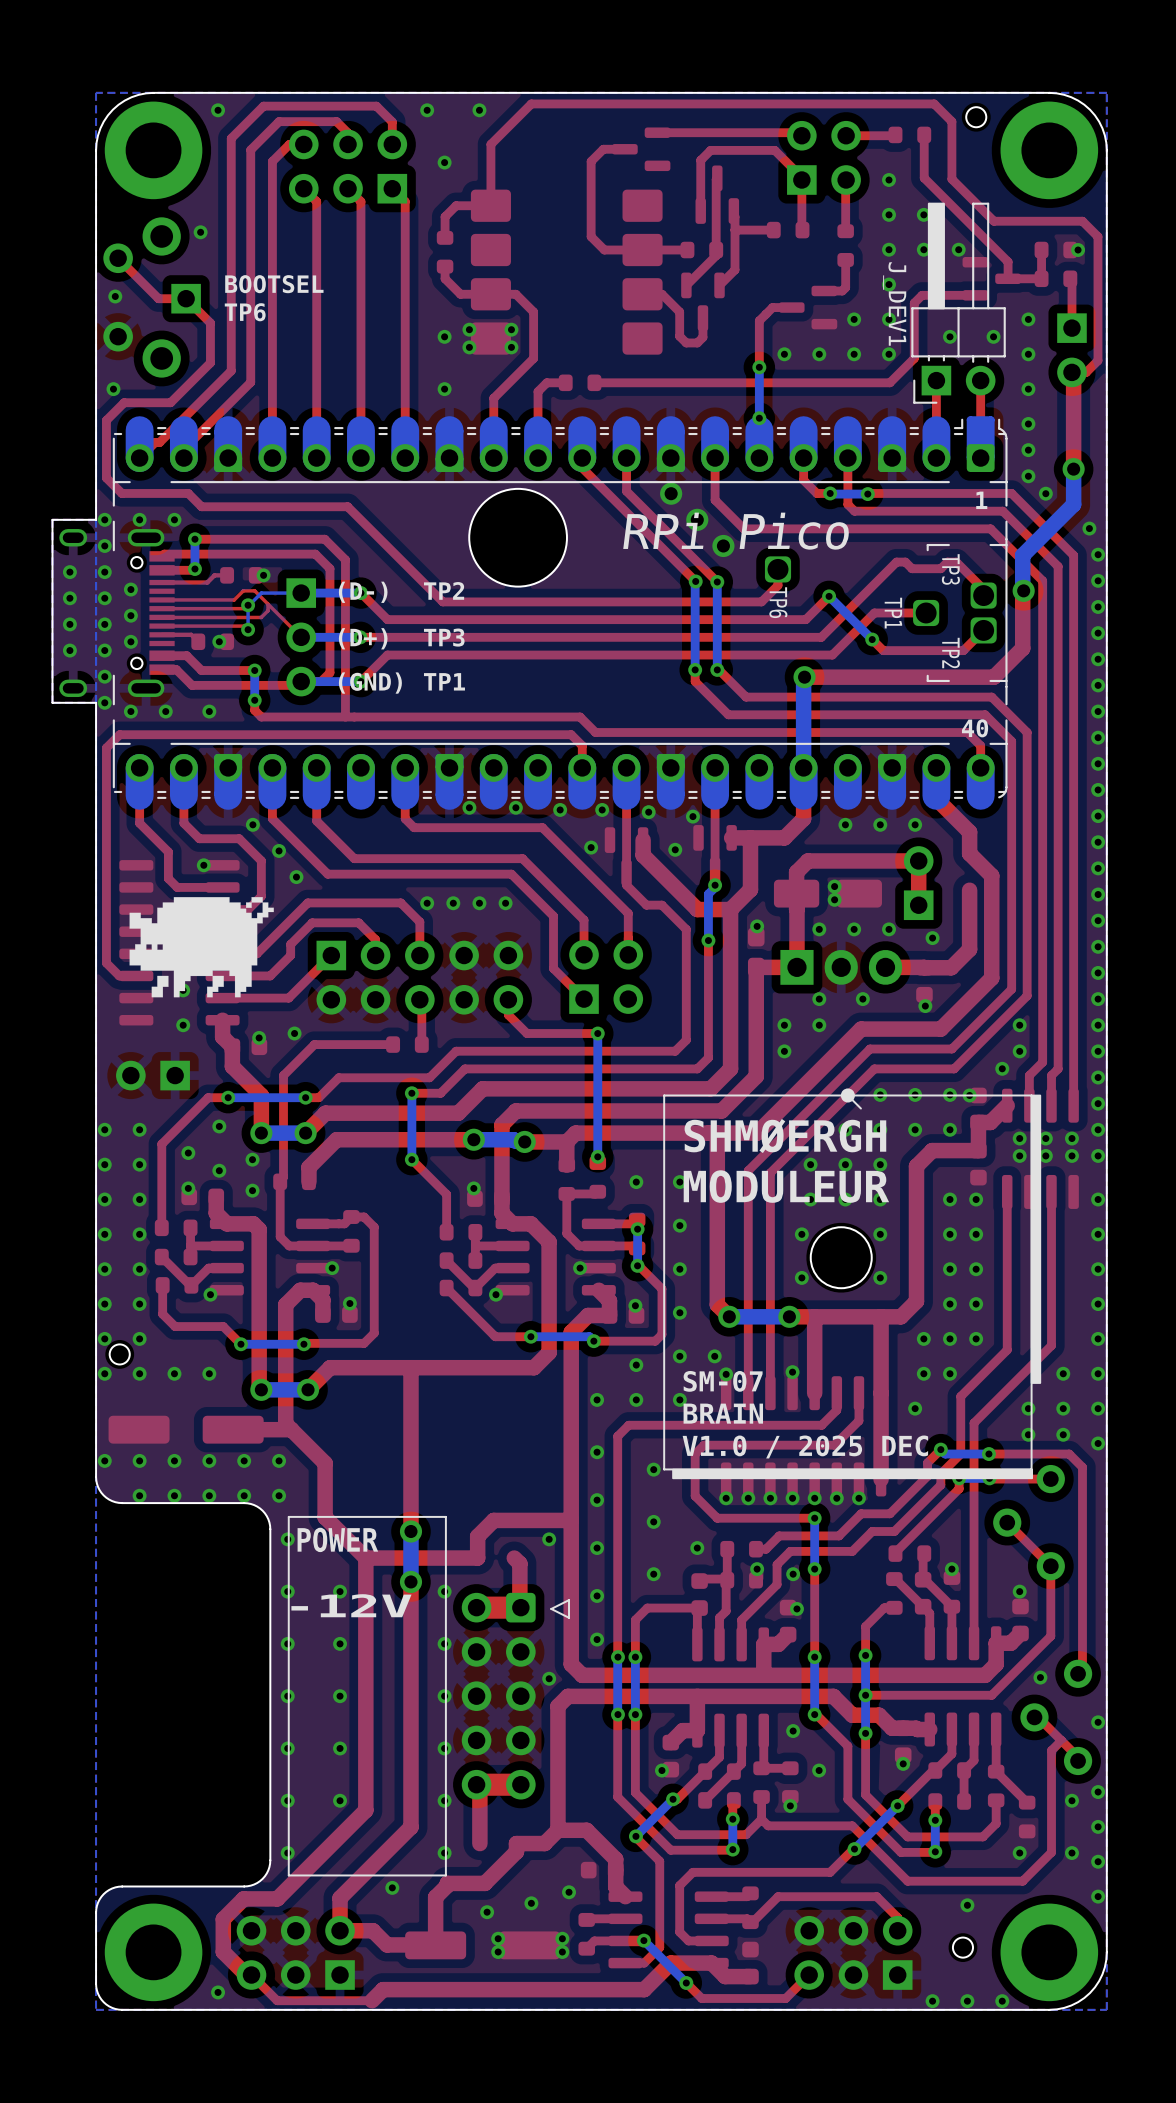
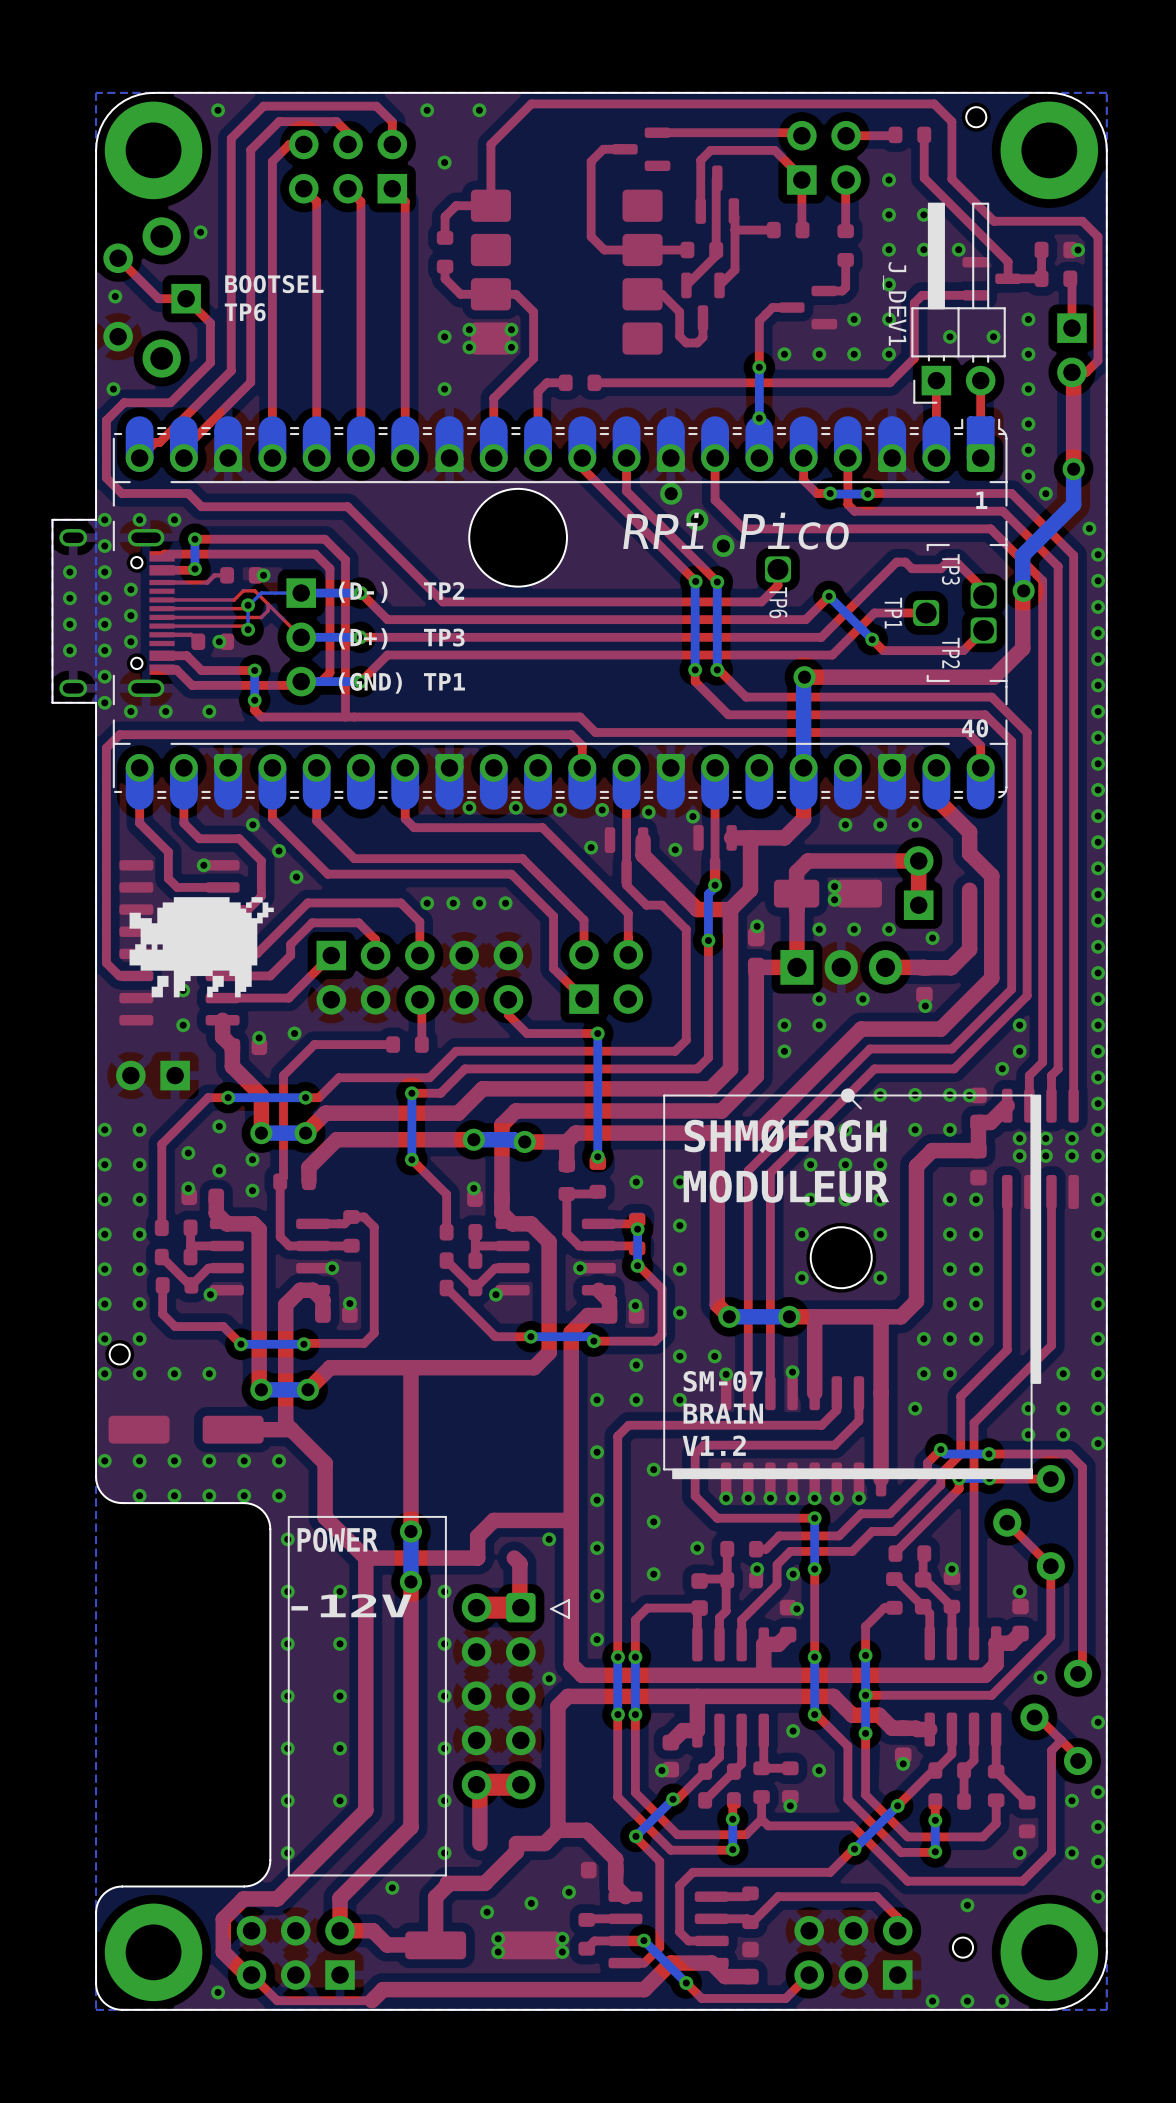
text: V1.0 / 2025 DEC (805, 1446) -> V1.2 (714, 1445)

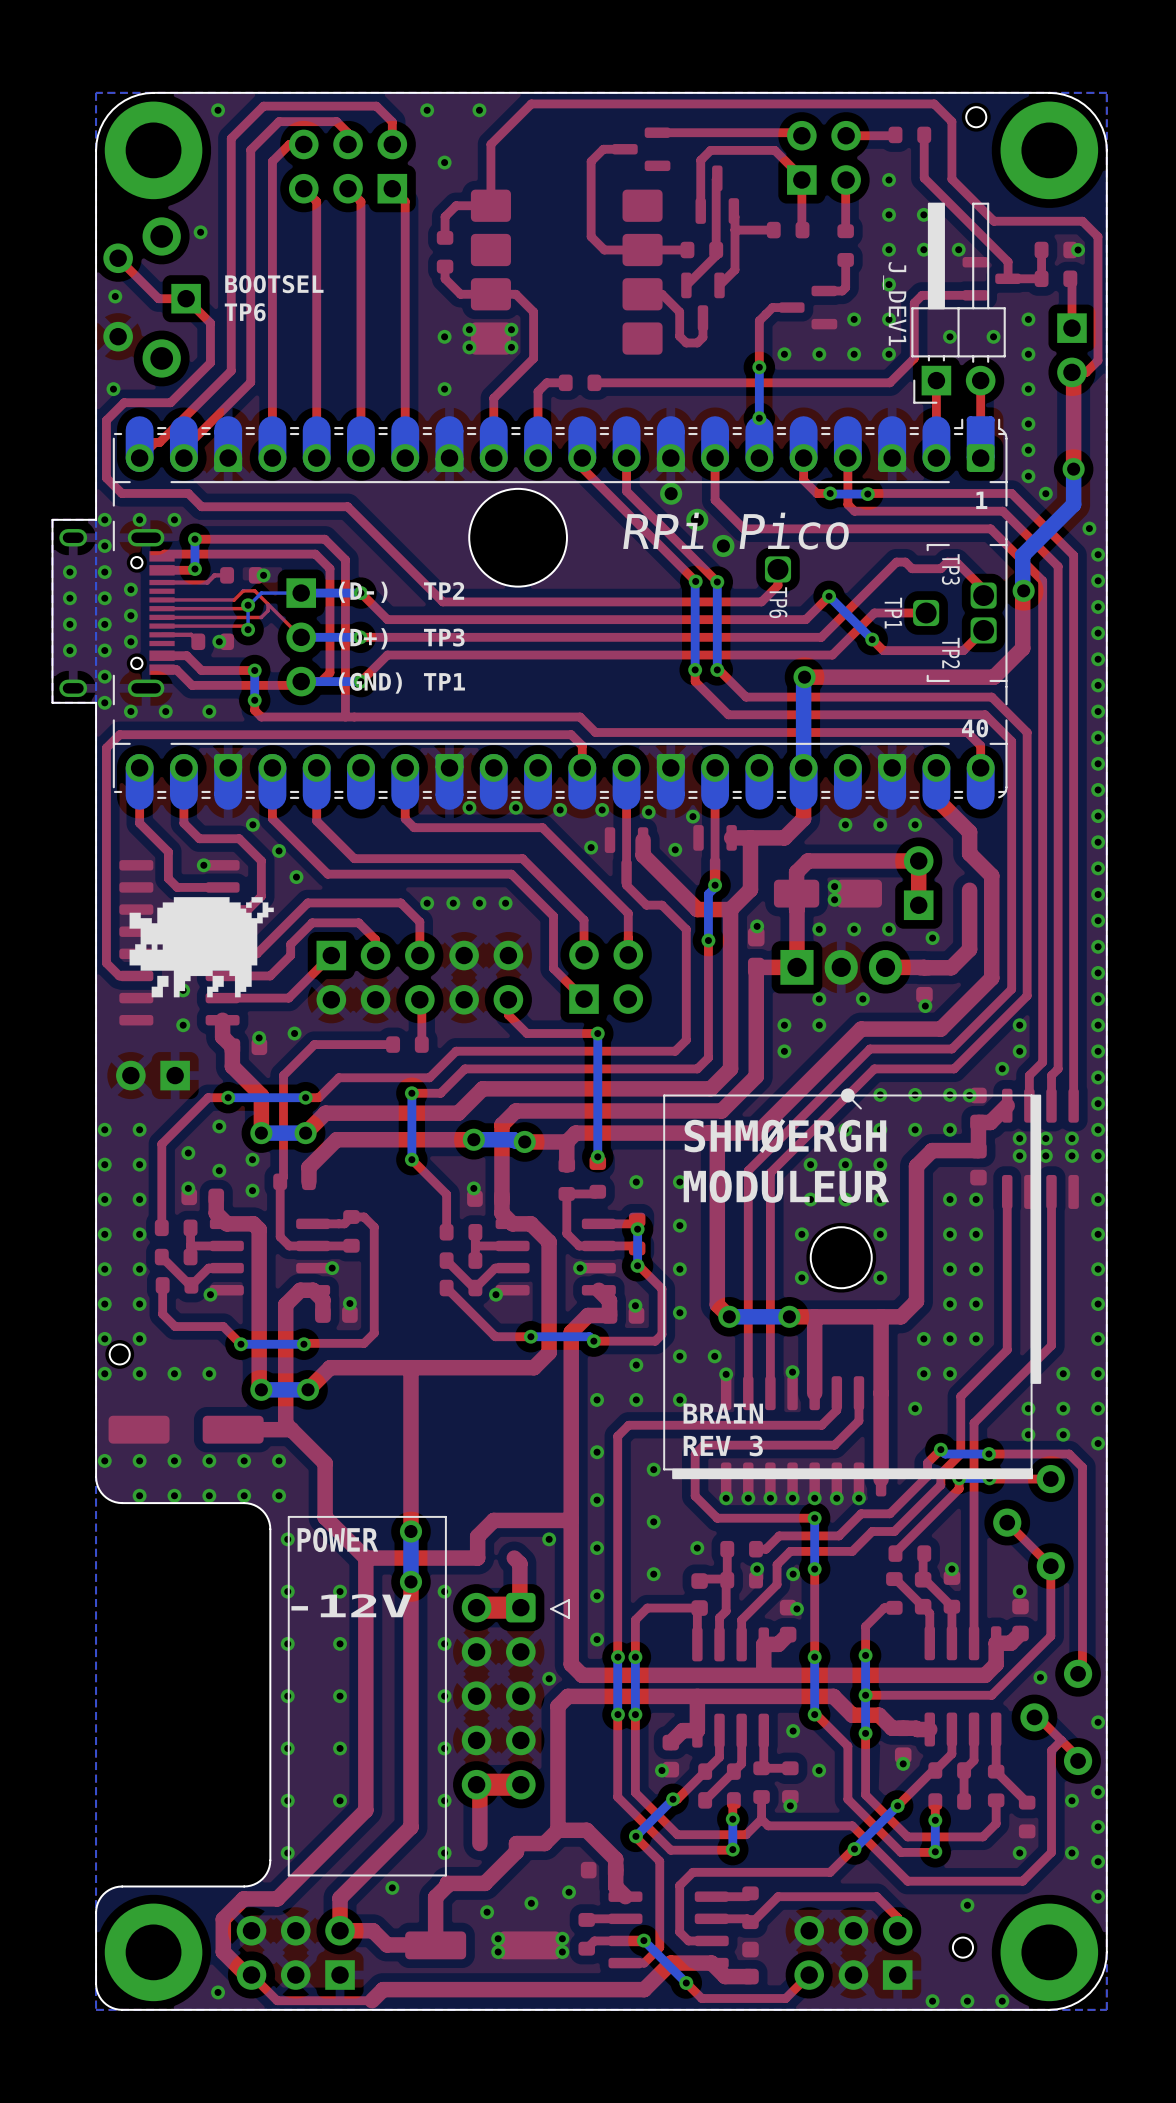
text: SM-07 (723, 1381) -> none
text: V1.2 (714, 1445) -> REV 3 (723, 1445)

